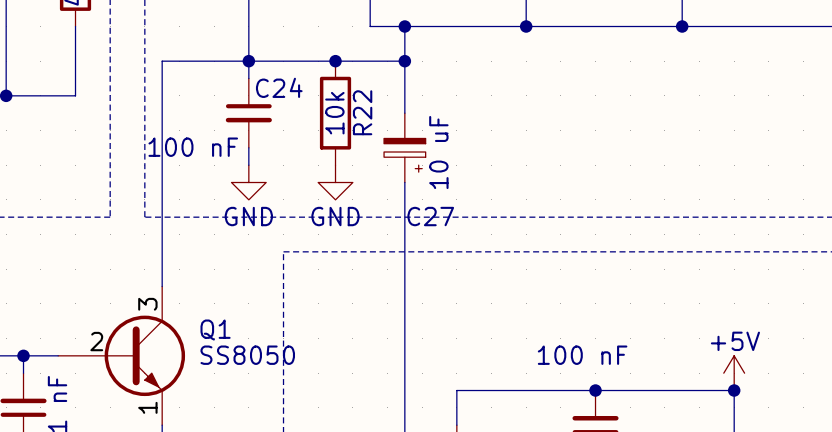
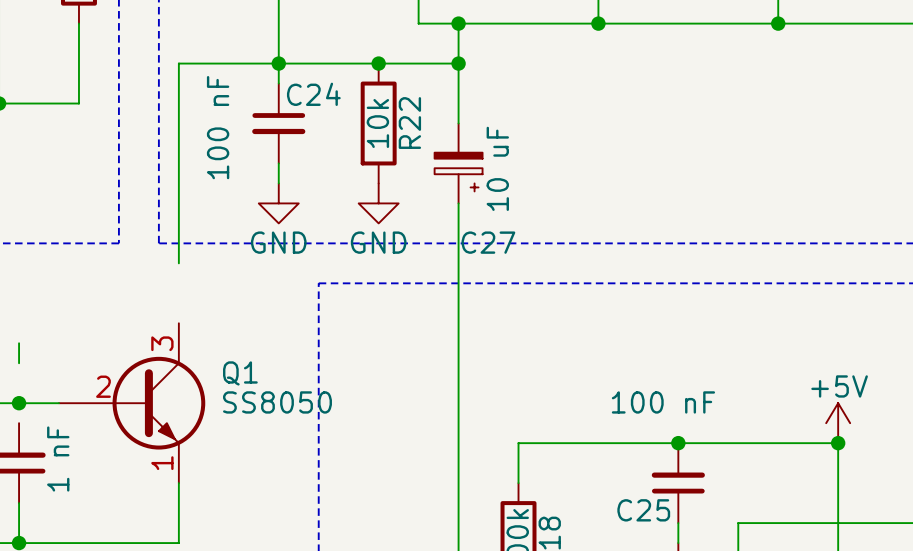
C24 value rotation: 0° (193, 147) -> 90° counterclockwise (218, 127)
wire: (162, 234) (162, 286) -> none
wire: (23, 355) (23, 373) -> (19, 343) (19, 363)

